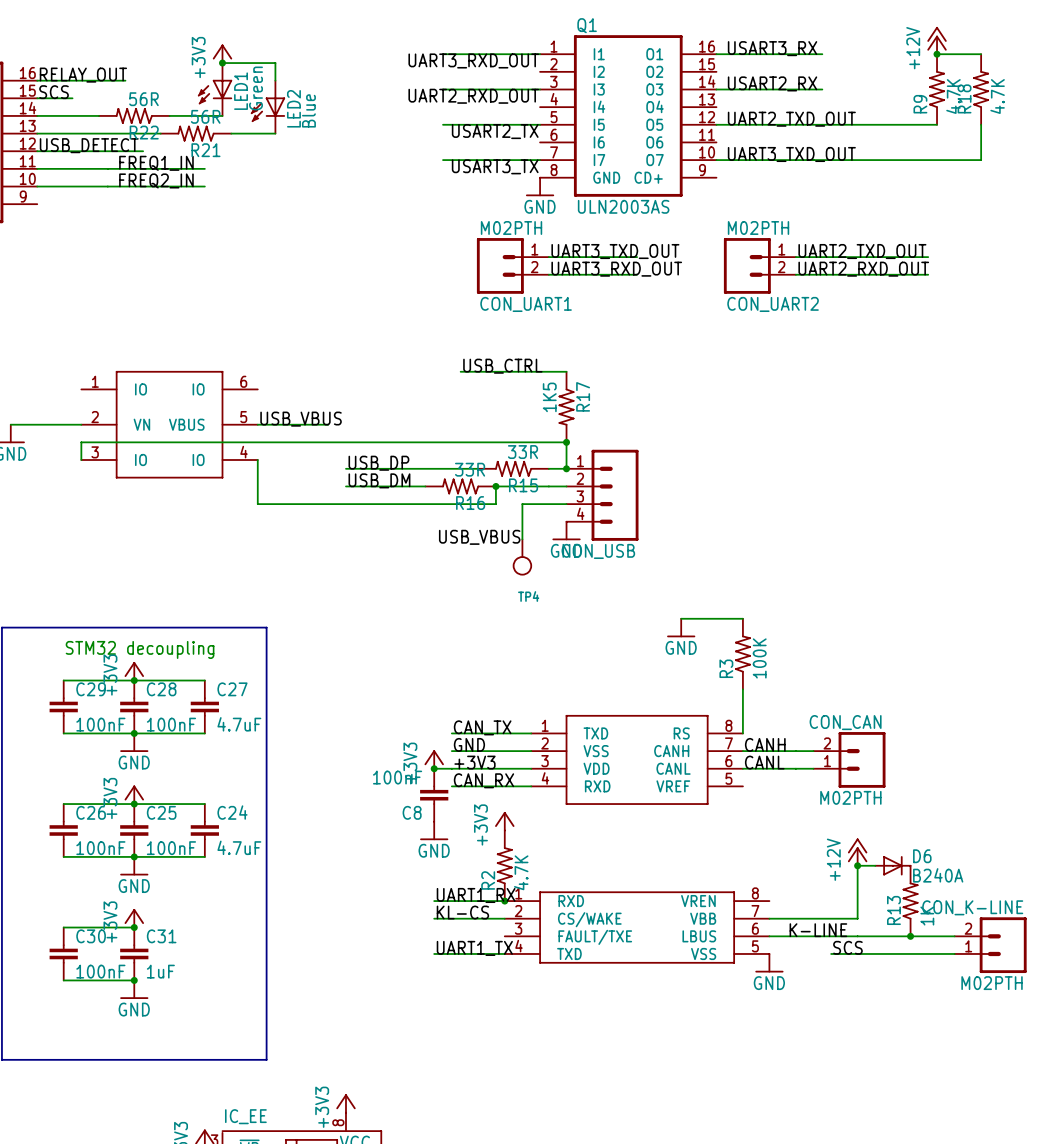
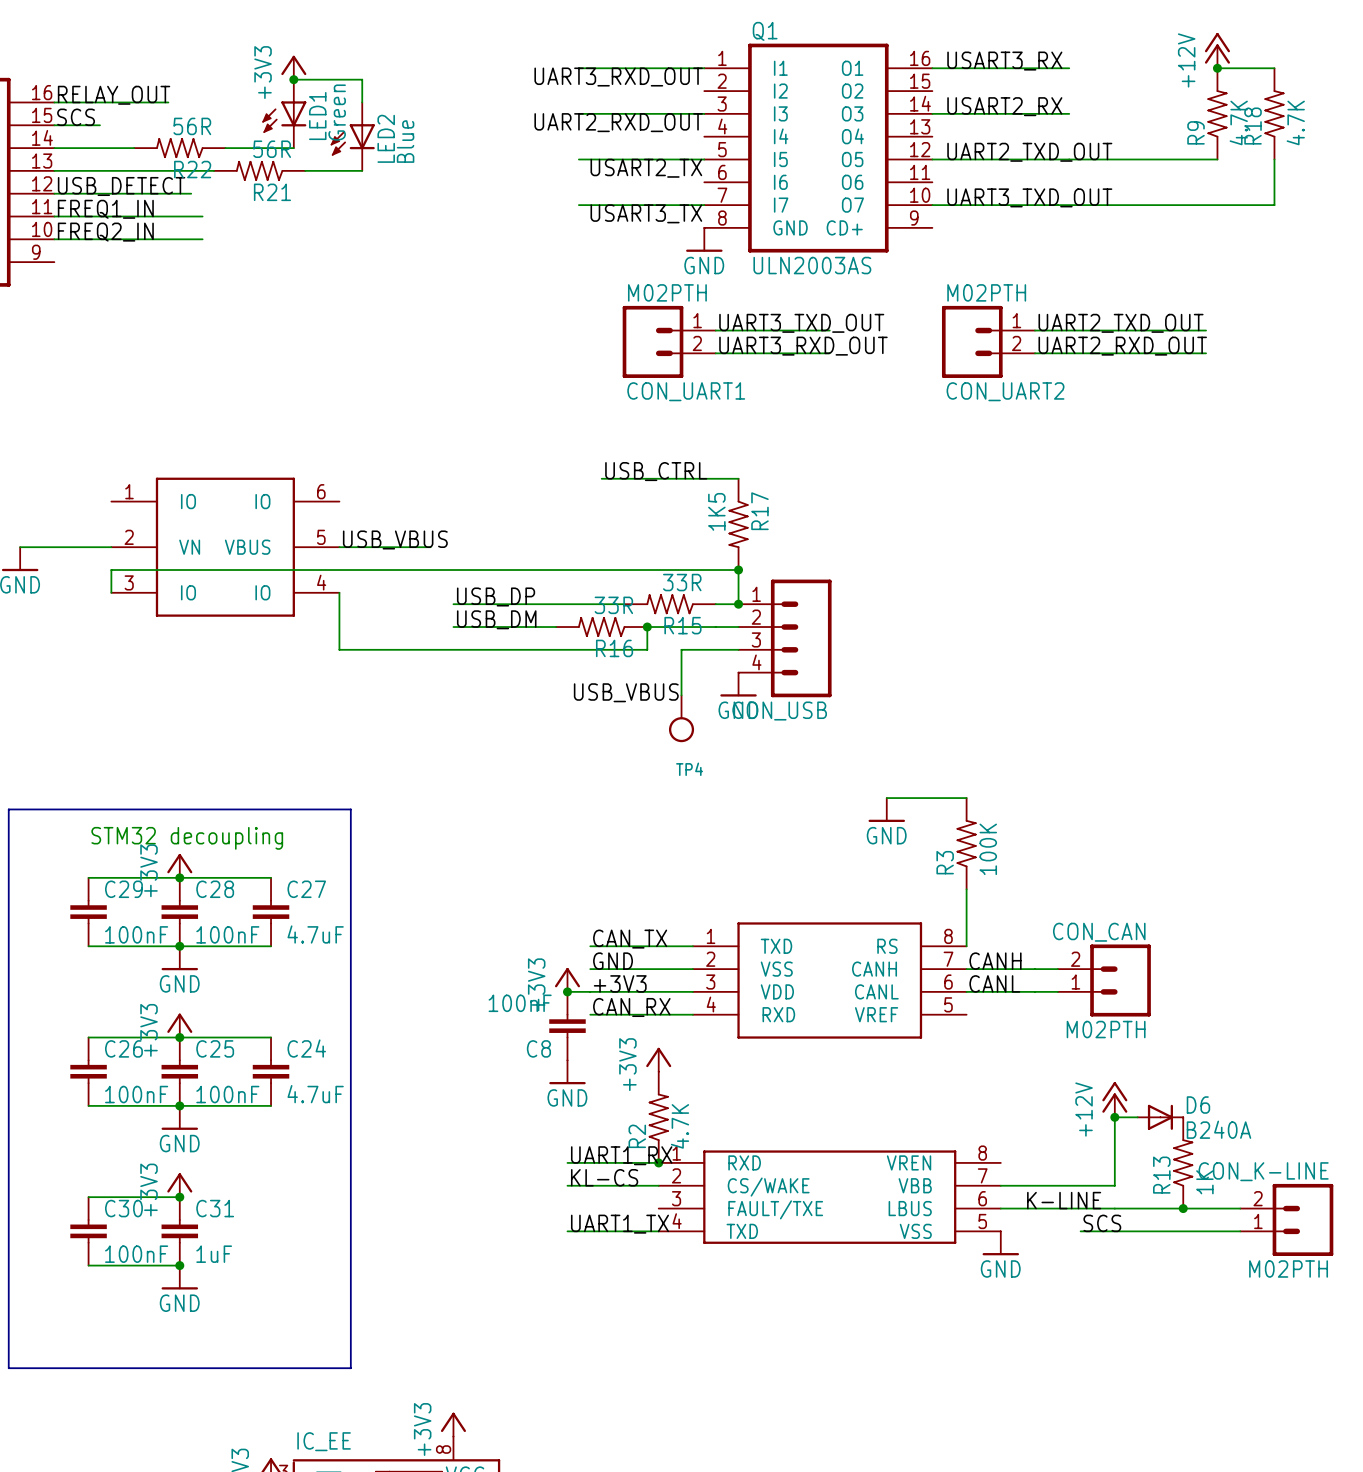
label position: FREQ1_IN (156, 163) -> FREQ1_IN (105, 209)
wire: (151, 168) (204, 168) -> none
label position: FREQ2_IN (156, 180) -> FREQ2_IN (105, 232)
wire: (151, 186) (204, 186) -> none

